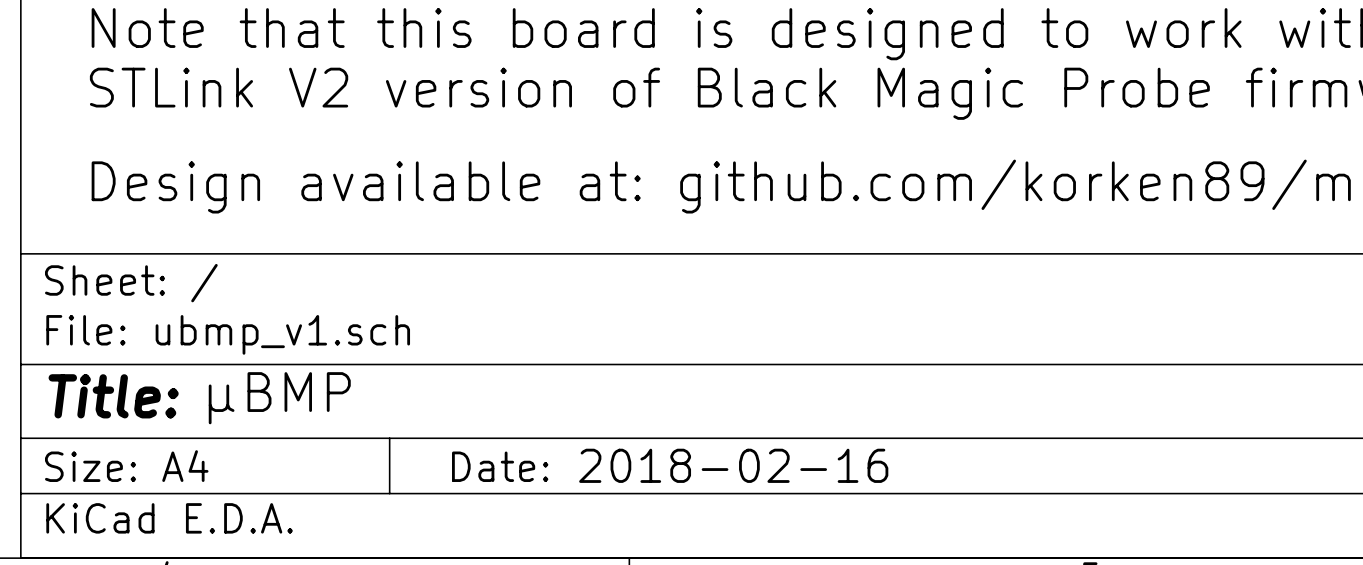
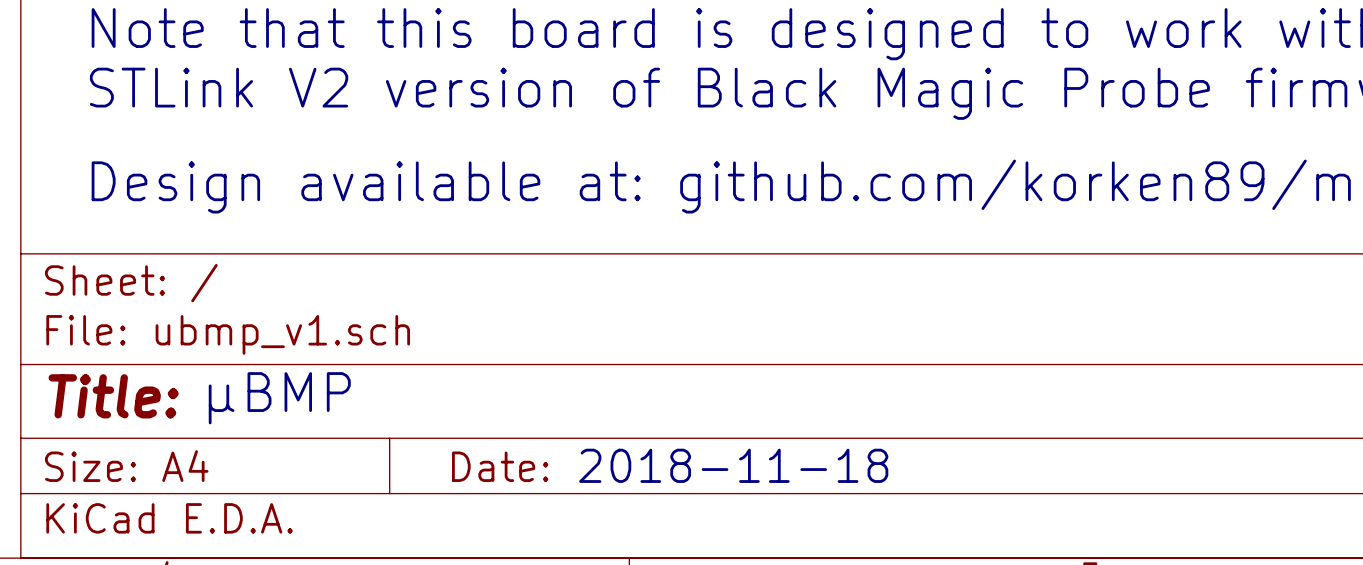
text: 2018-02-16 (733, 465) -> 2018-11-18 (733, 465)

